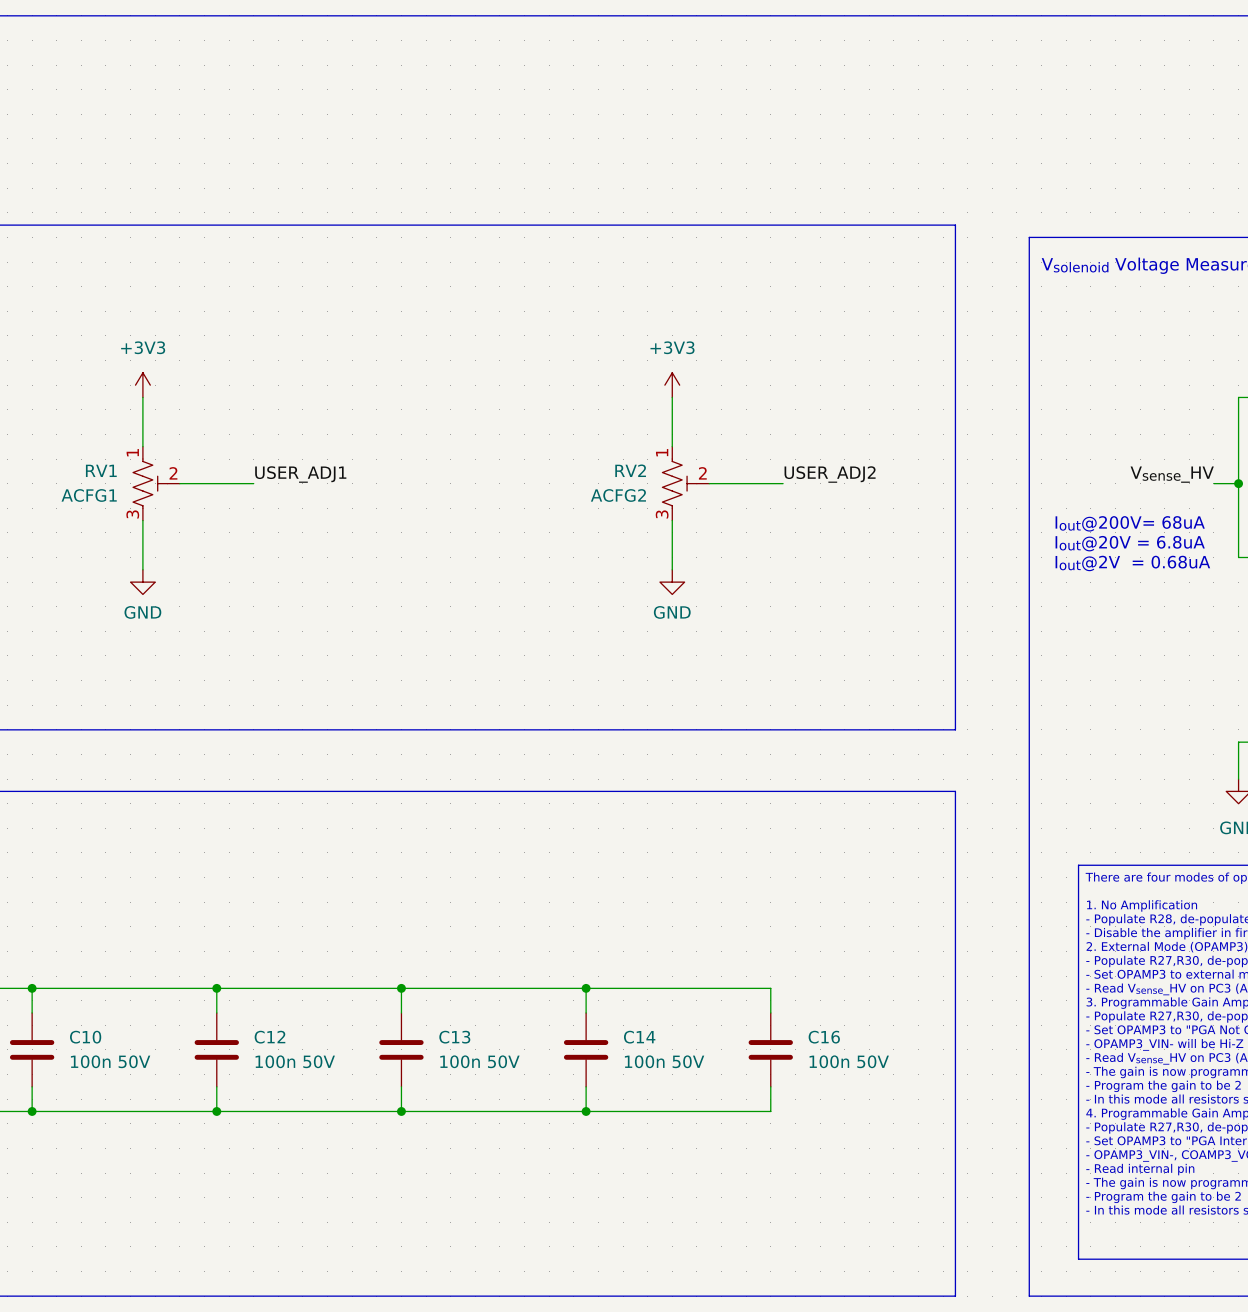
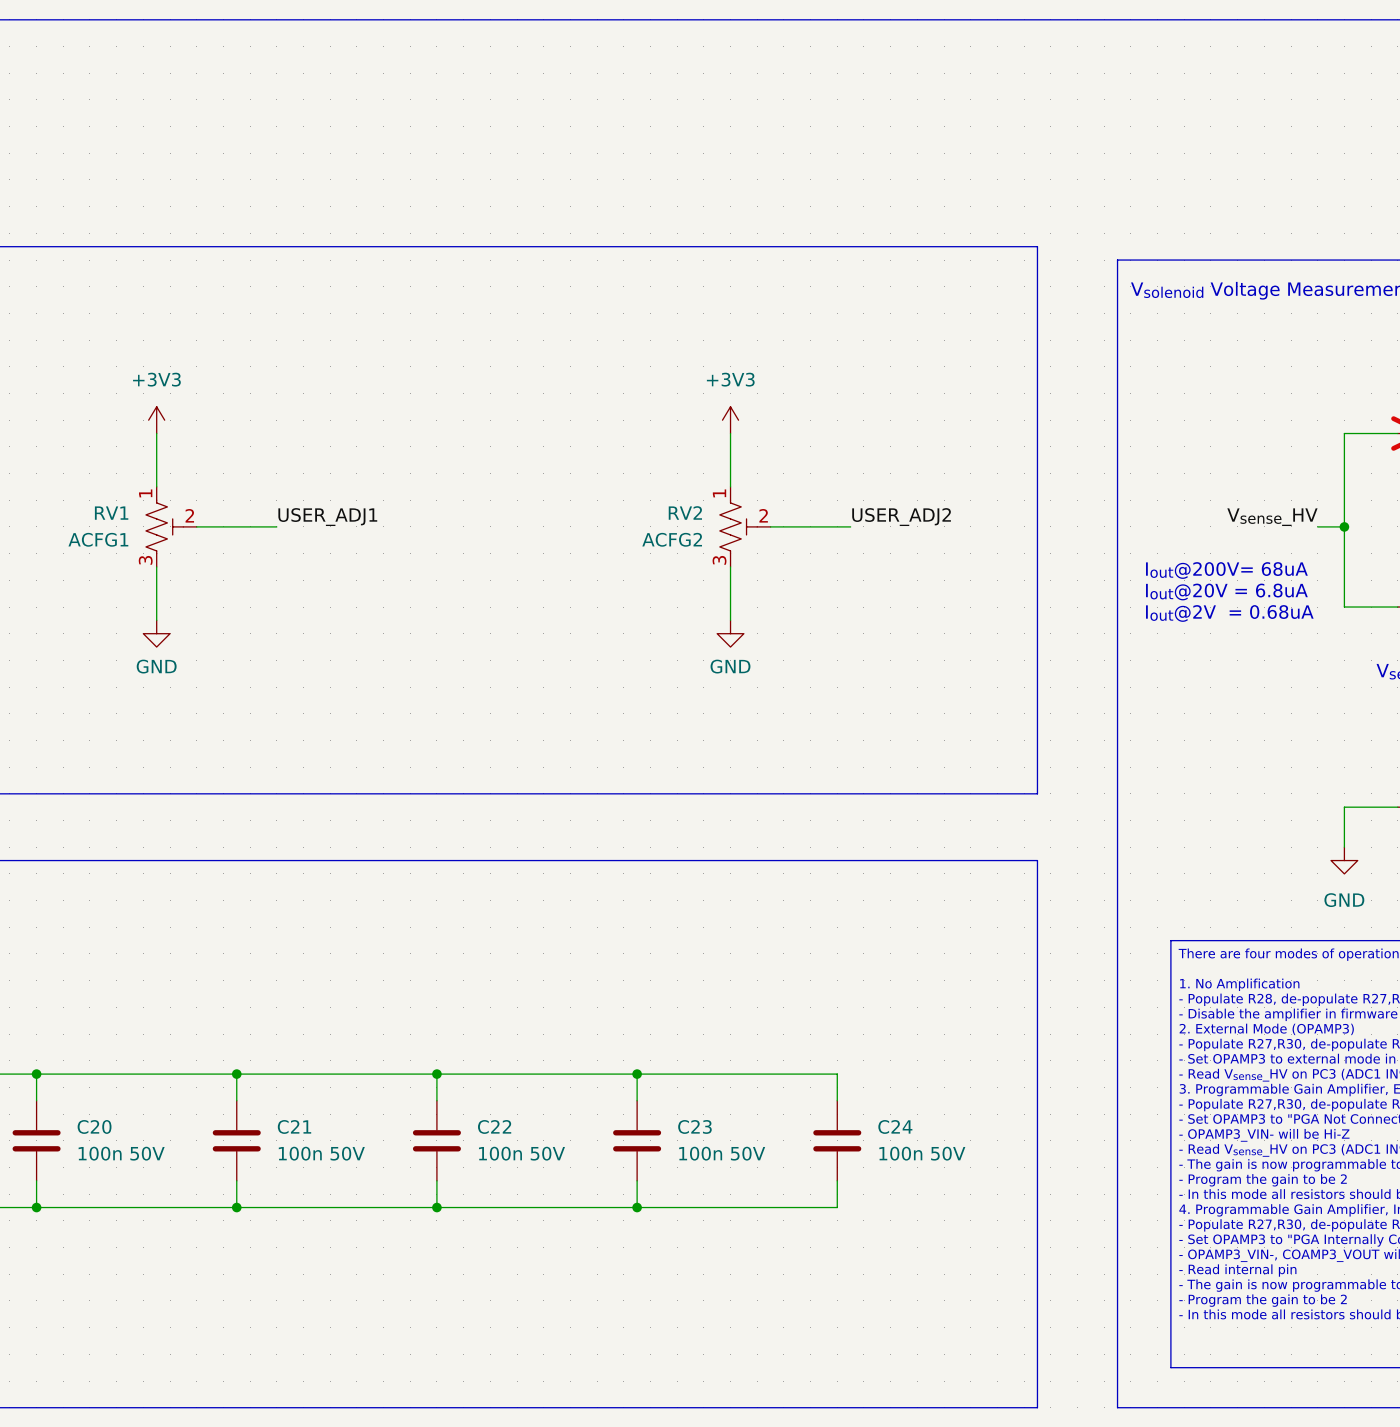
C10 name: C10 (85, 1037) -> C20 (94, 1126)
C12 name: C12 (269, 1037) -> C21 (294, 1126)
C13 name: C13 (454, 1037) -> C22 (494, 1126)
C14 name: C14 (639, 1037) -> C23 (694, 1126)
C16 name: C16 (824, 1037) -> C24 (895, 1126)

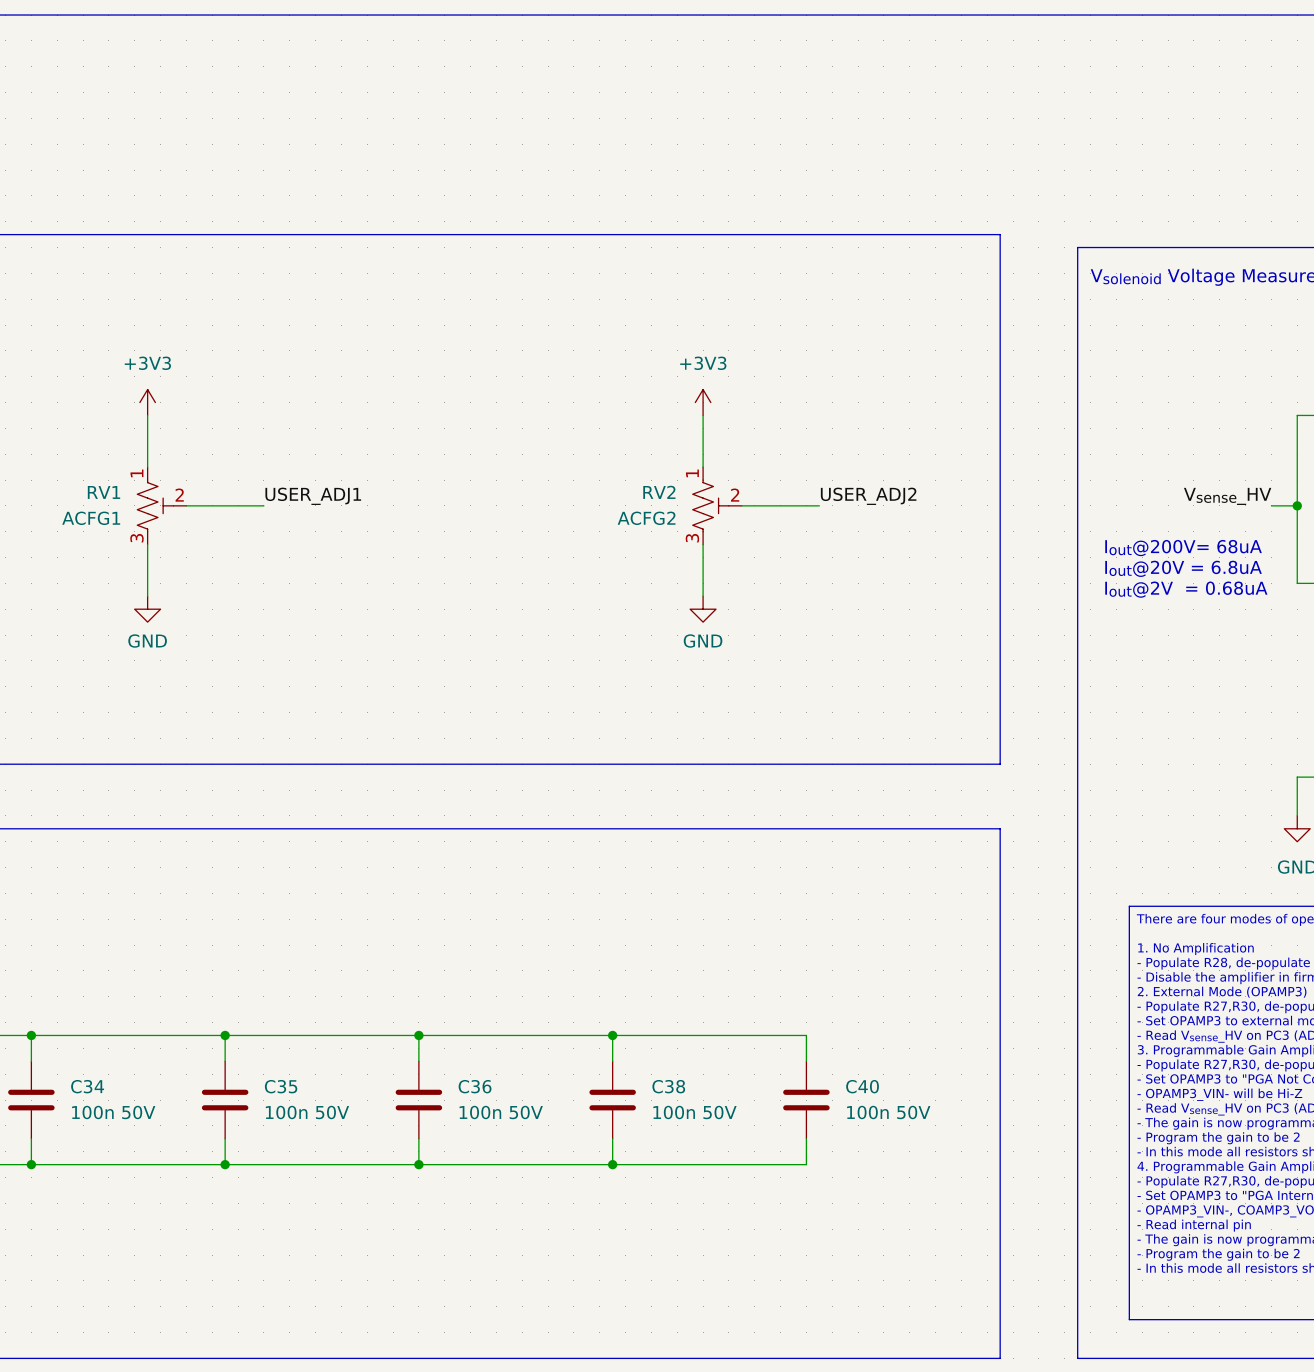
C20 name: C20 (94, 1126) -> C34 (87, 1086)
C21 name: C21 (294, 1126) -> C35 (281, 1086)
C22 name: C22 (494, 1126) -> C36 (475, 1086)
C23 name: C23 (694, 1126) -> C38 (668, 1086)
C24 name: C24 (895, 1126) -> C40 (862, 1086)

